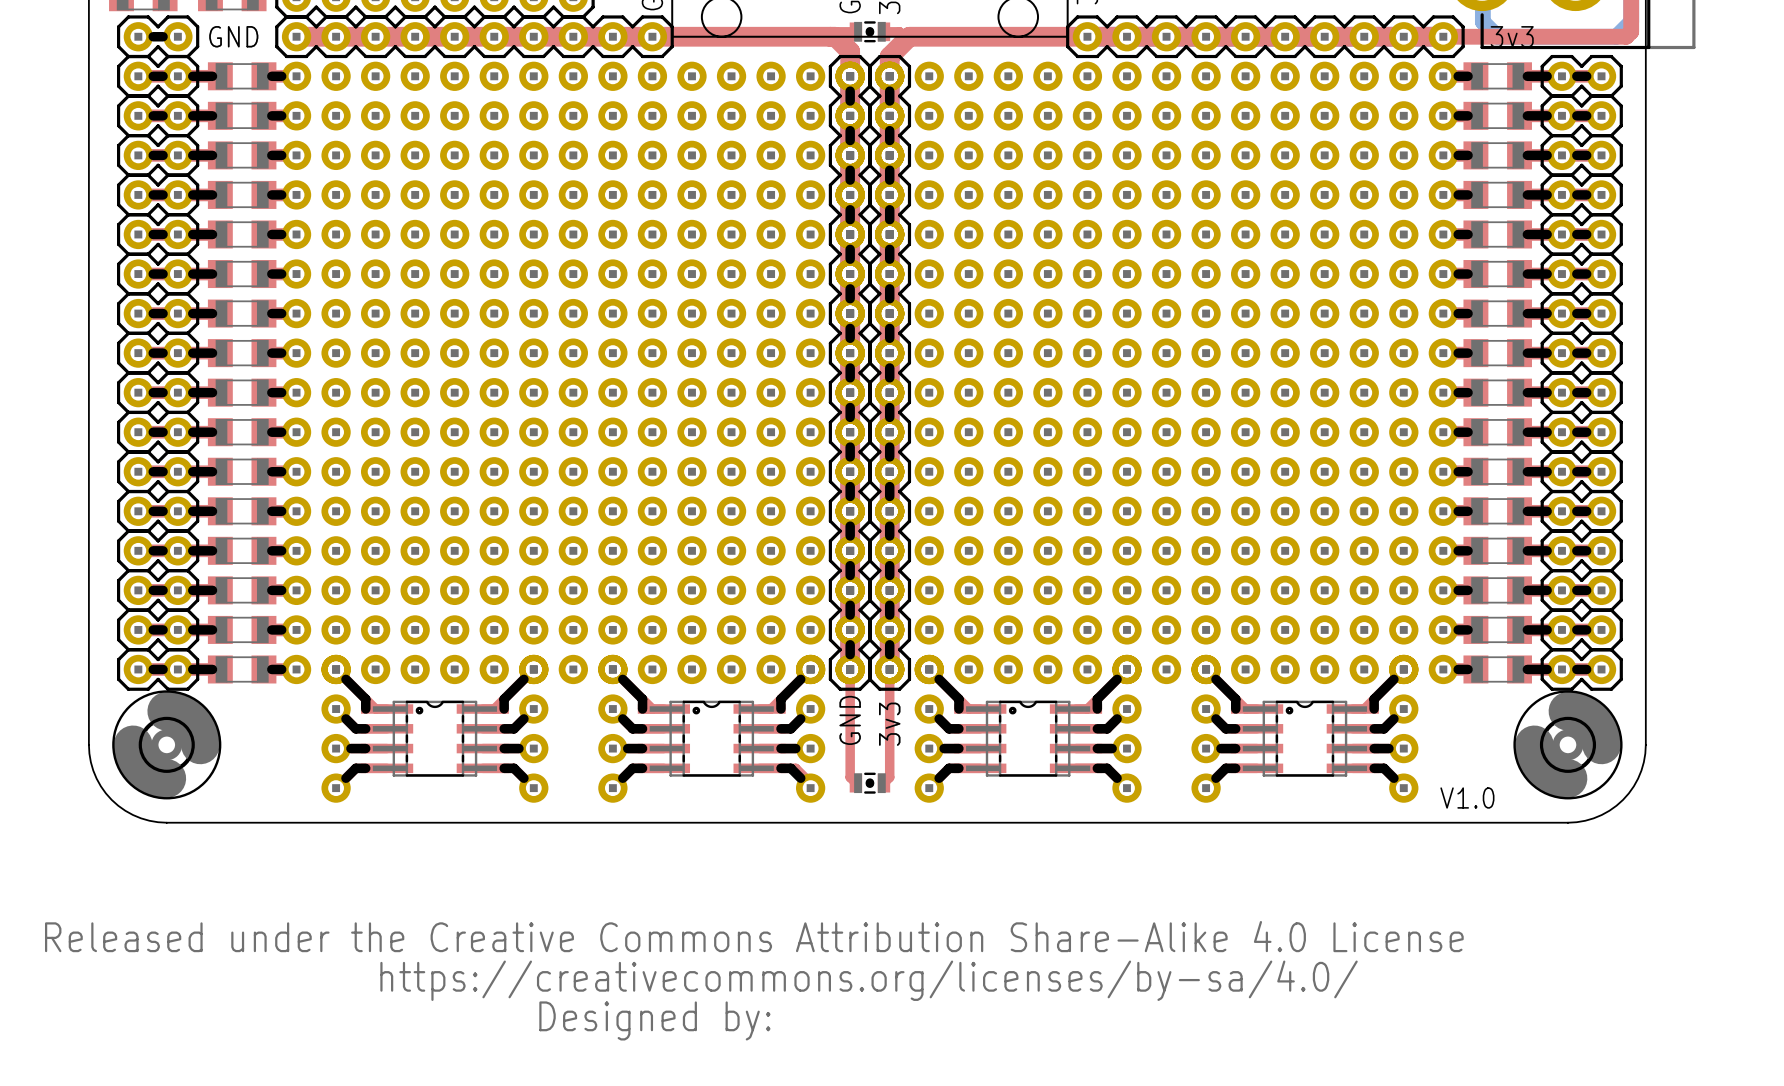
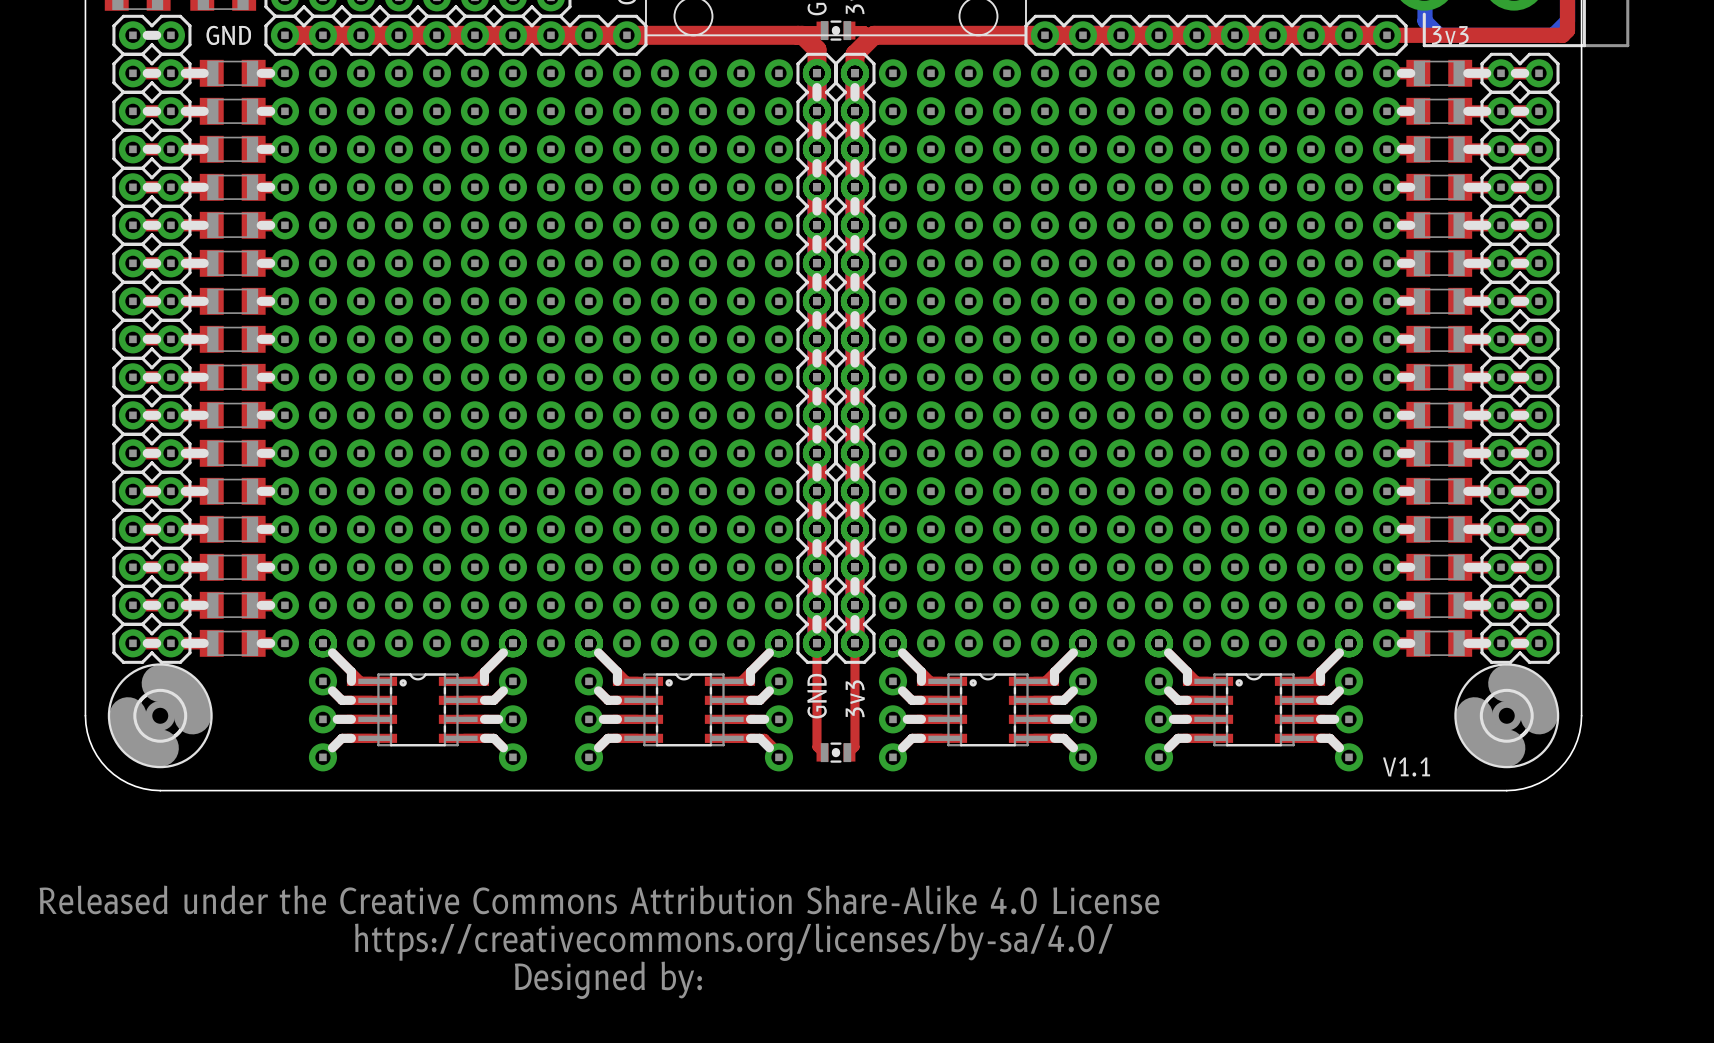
text: V1.0 (1467, 798) -> V1.1 (1406, 766)

